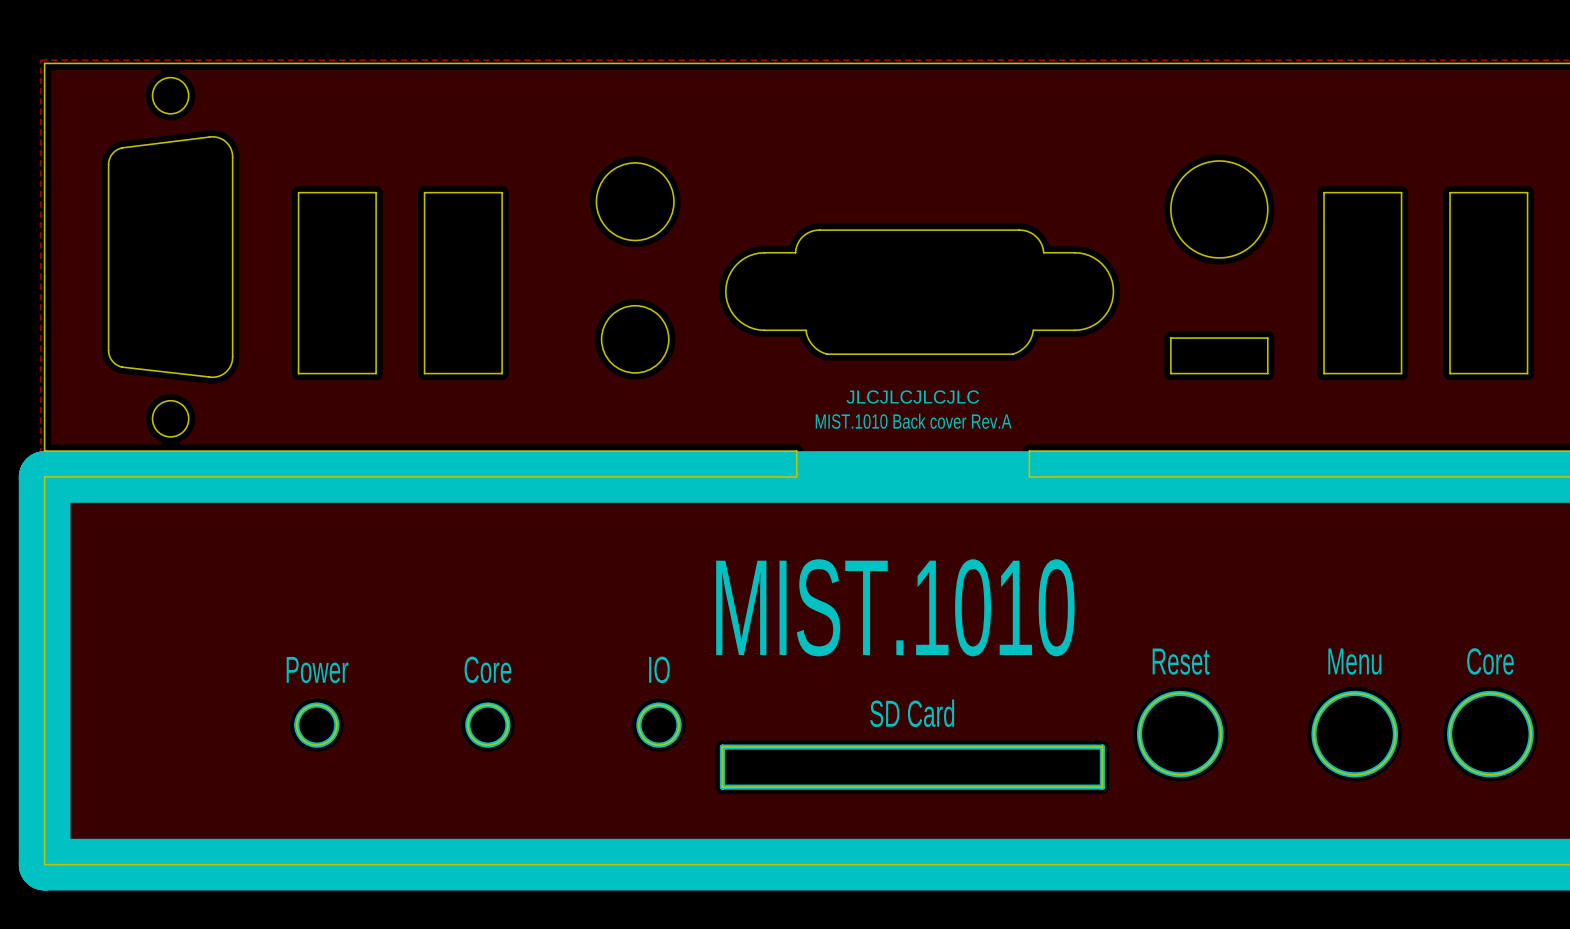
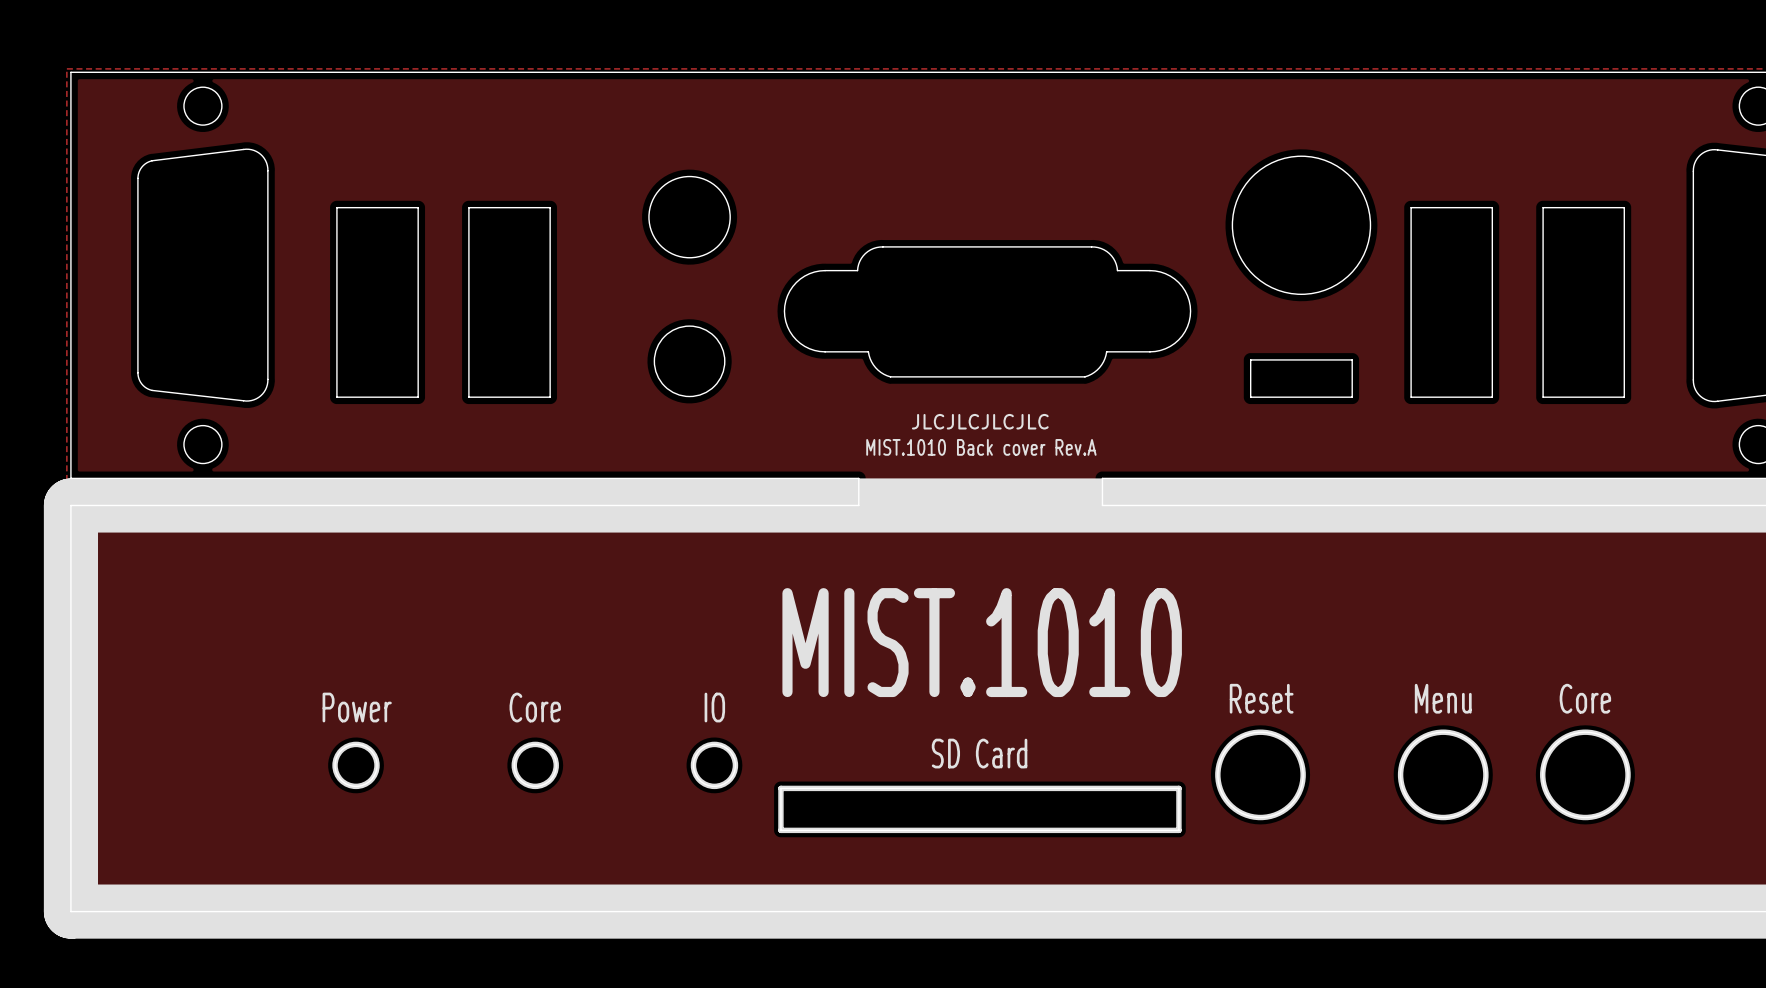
round board edge size: [1170, 160, 1269, 259] -> [1231, 155, 1372, 295]

